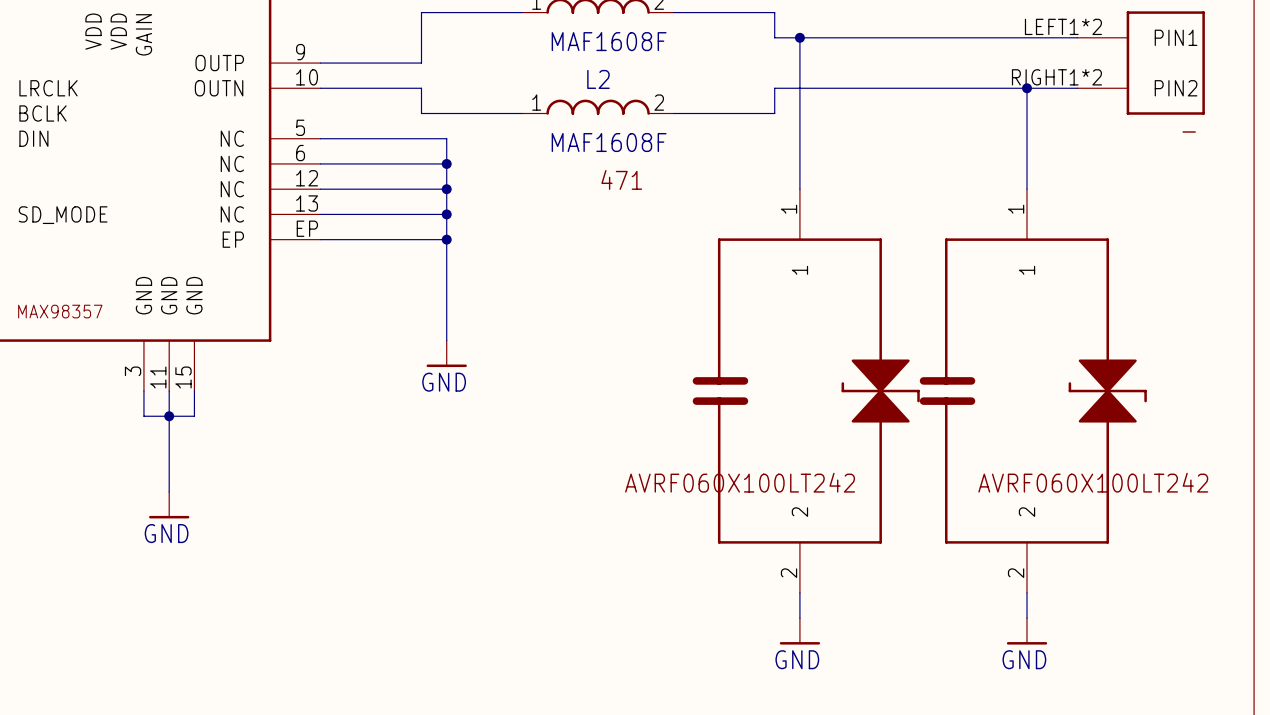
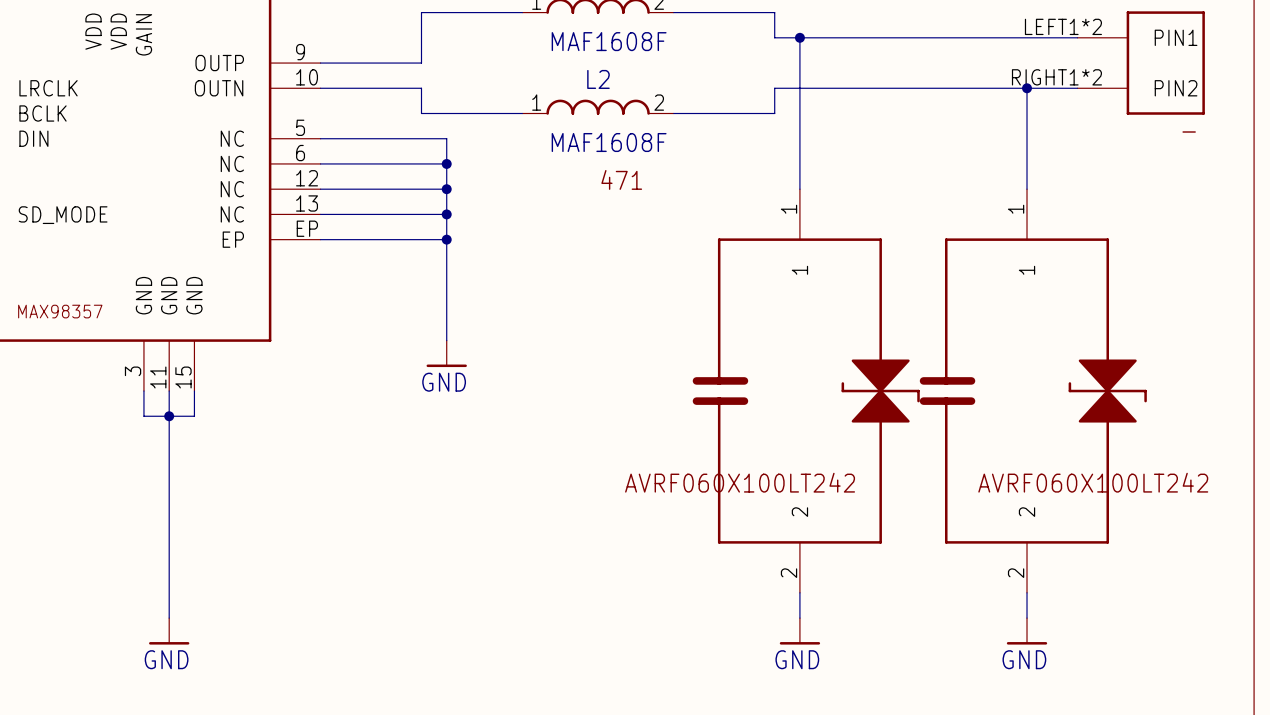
wire: none -> (169, 491) (169, 618)
power symbol position: GND (169, 505) -> GND (169, 631)

